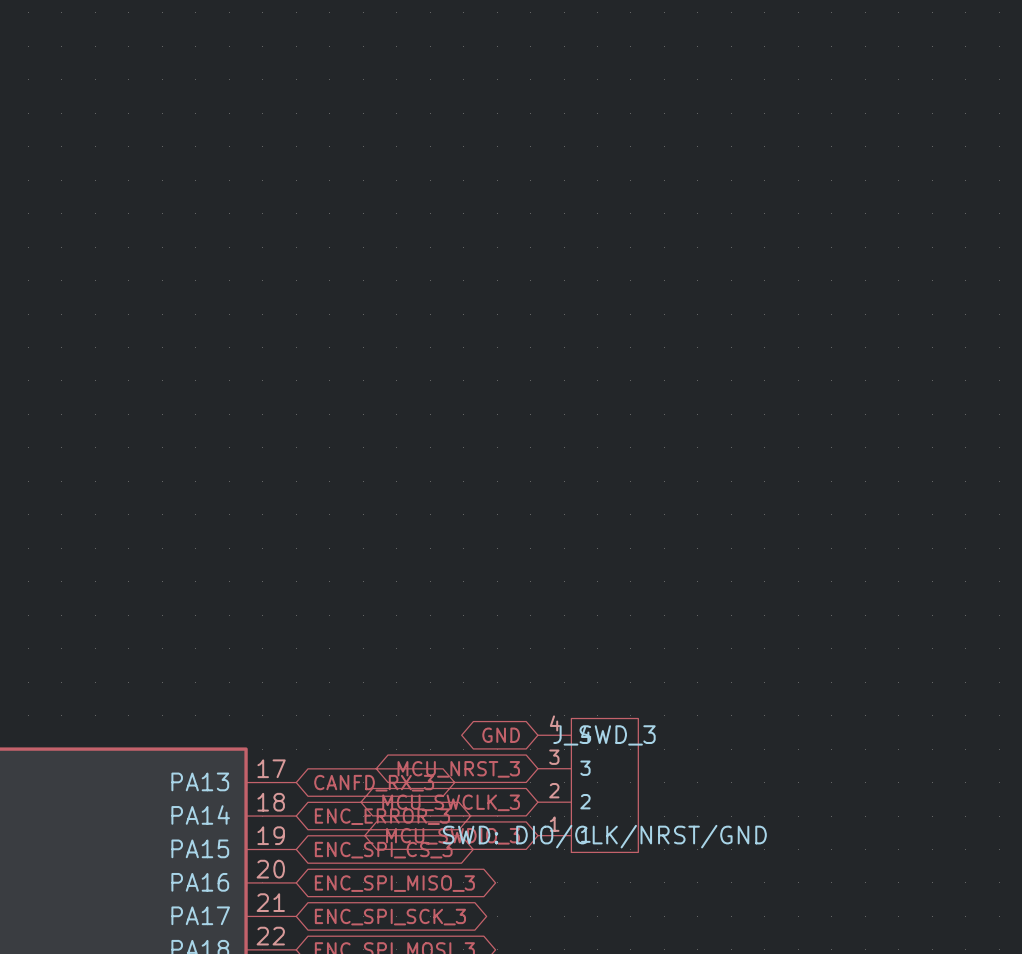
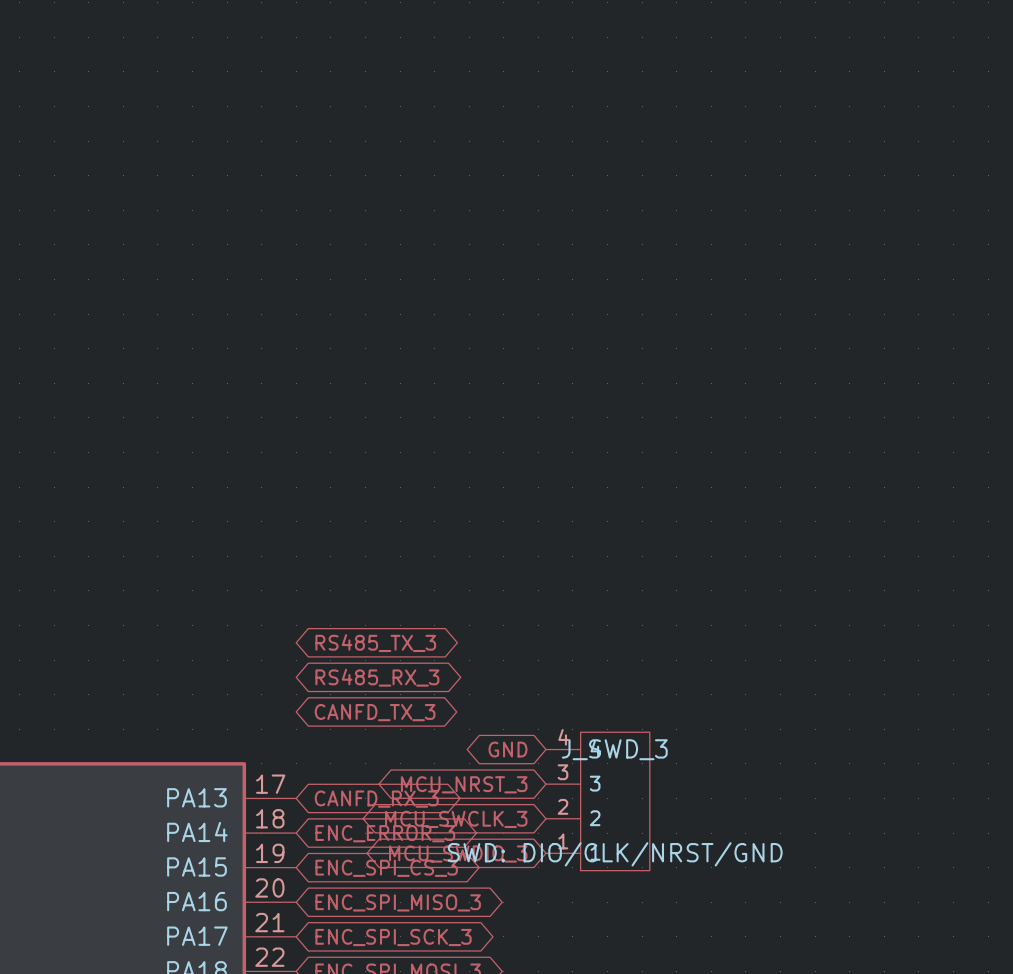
global label: none -> RS485_TX_3 (375, 643)
global label: none -> RS485_RX_3 (377, 677)
global label: none -> CANFD_TX_3 (375, 712)

